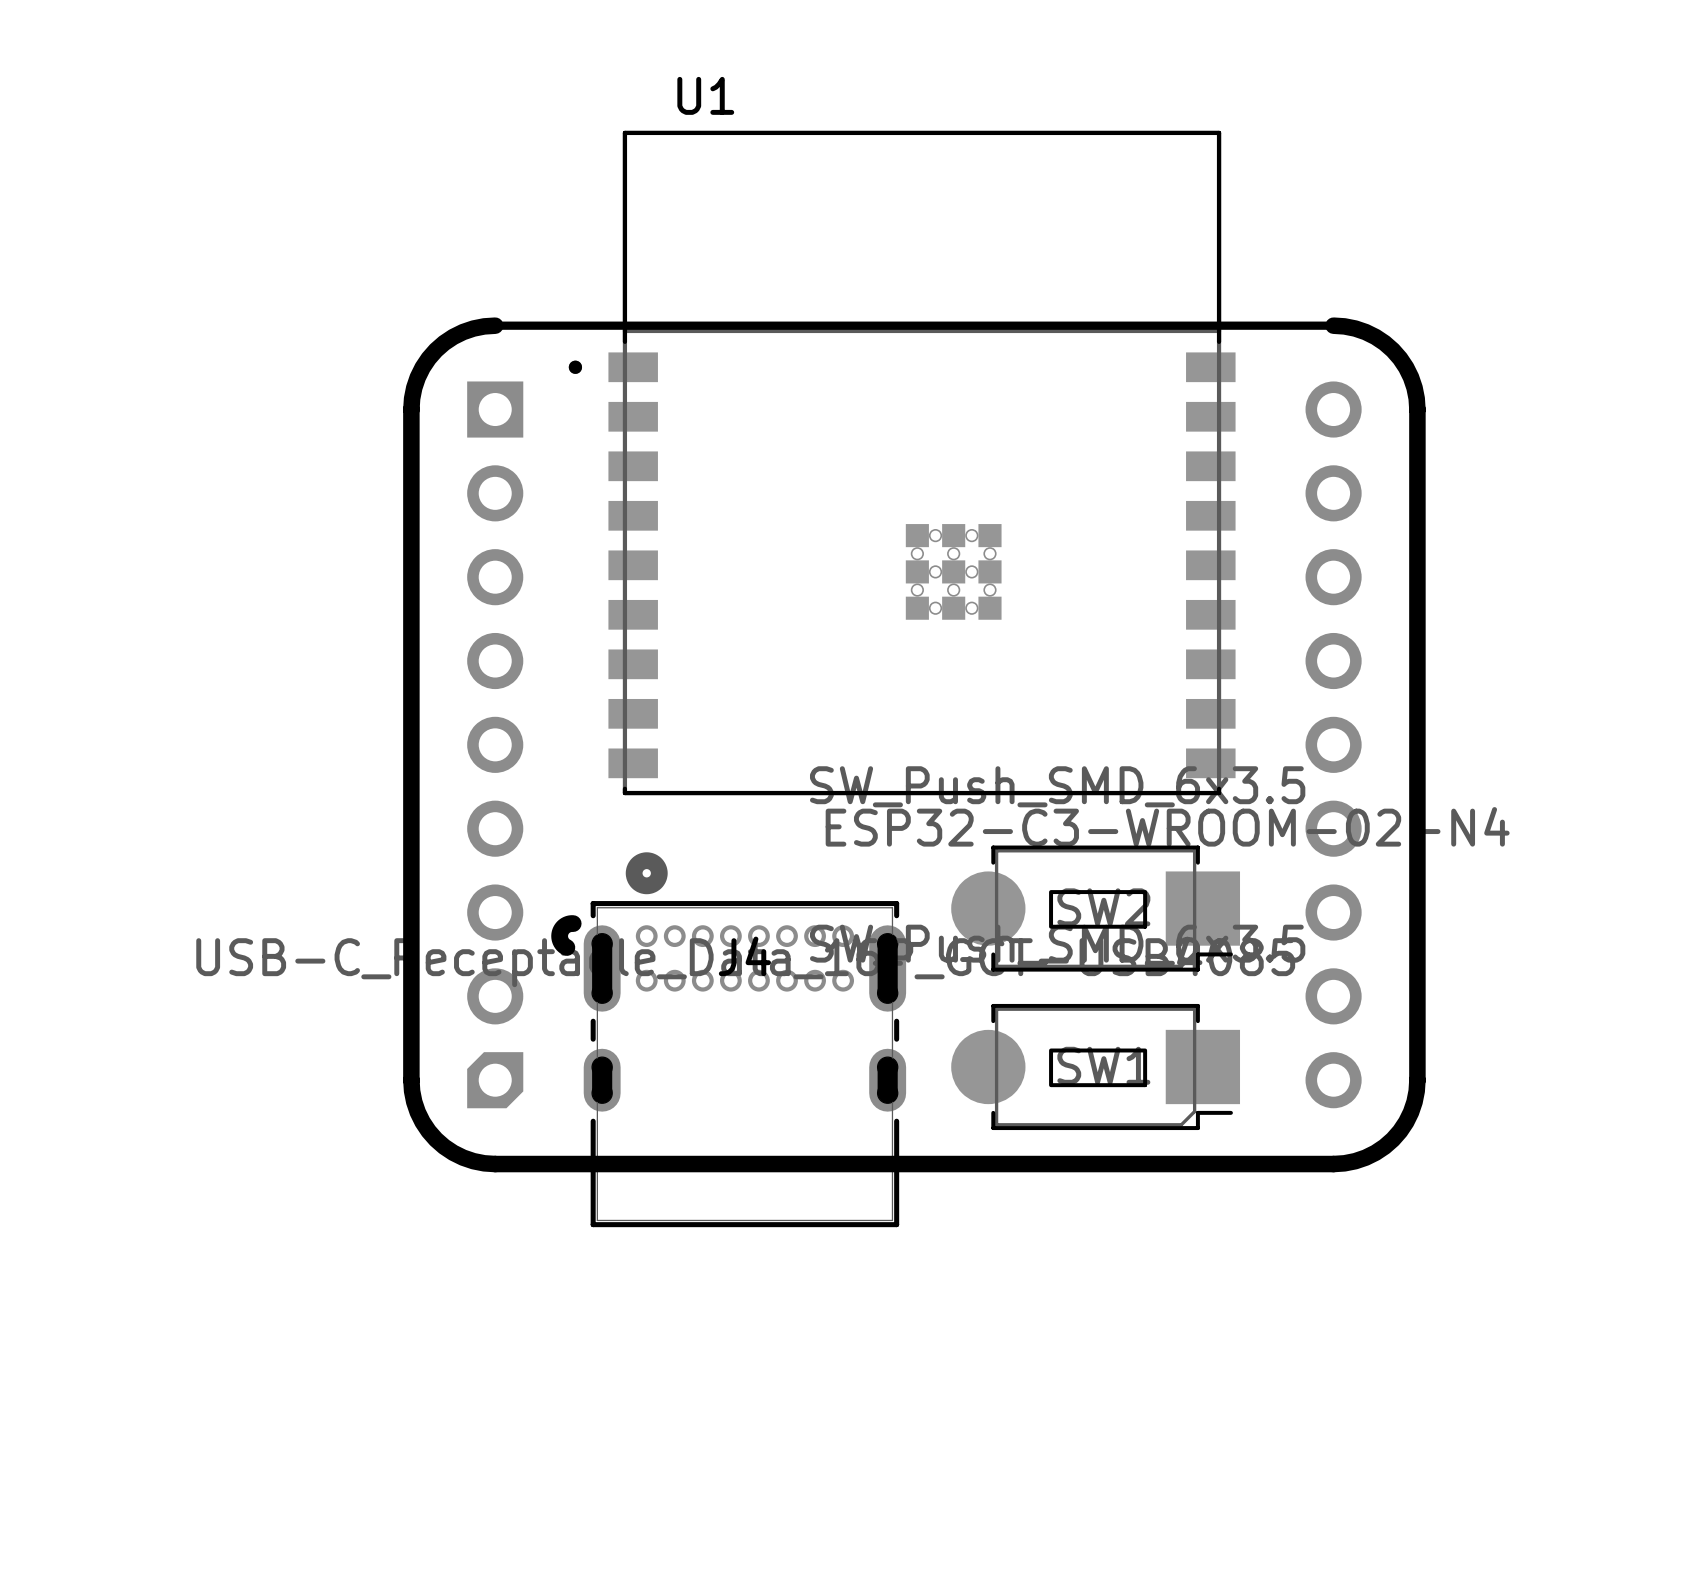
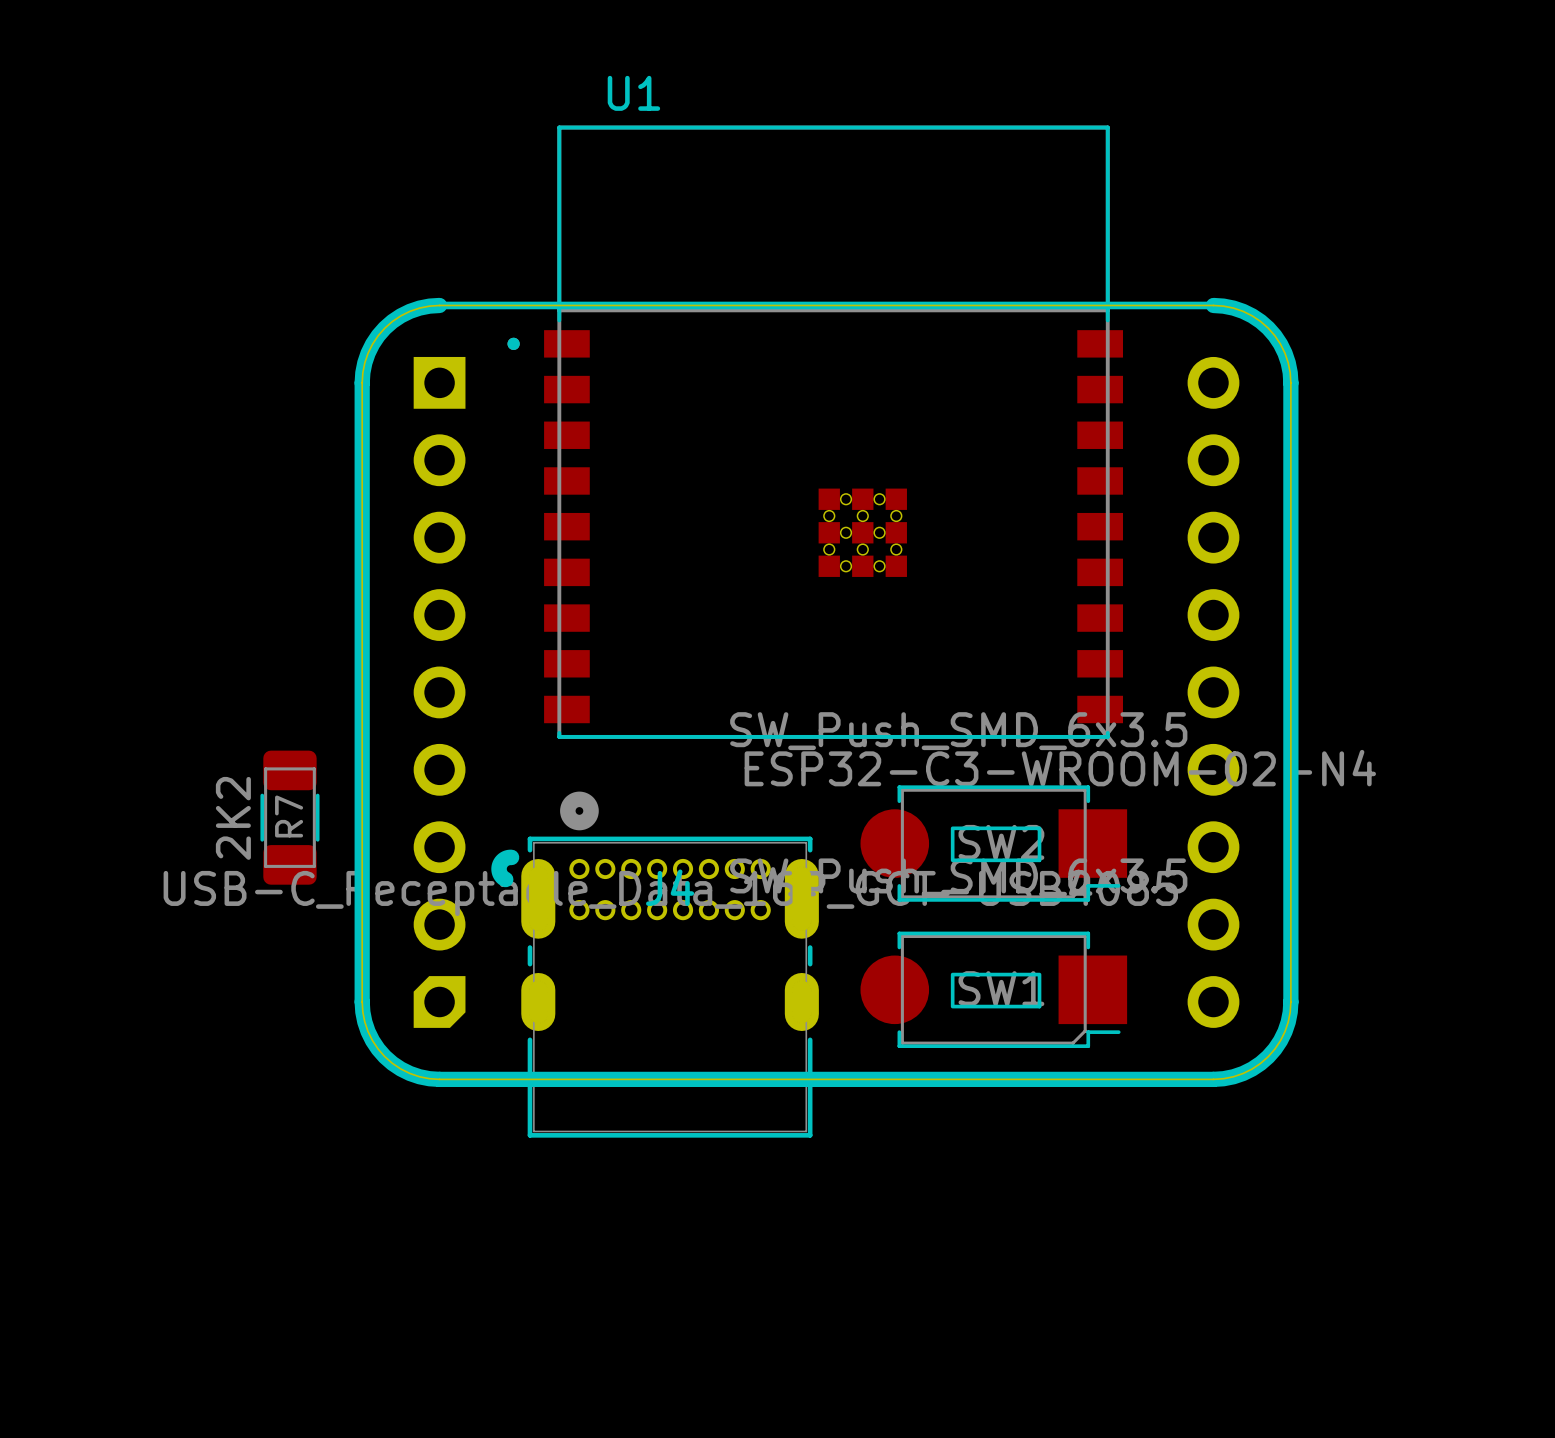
R7: none -> 2K2 (289, 817)

